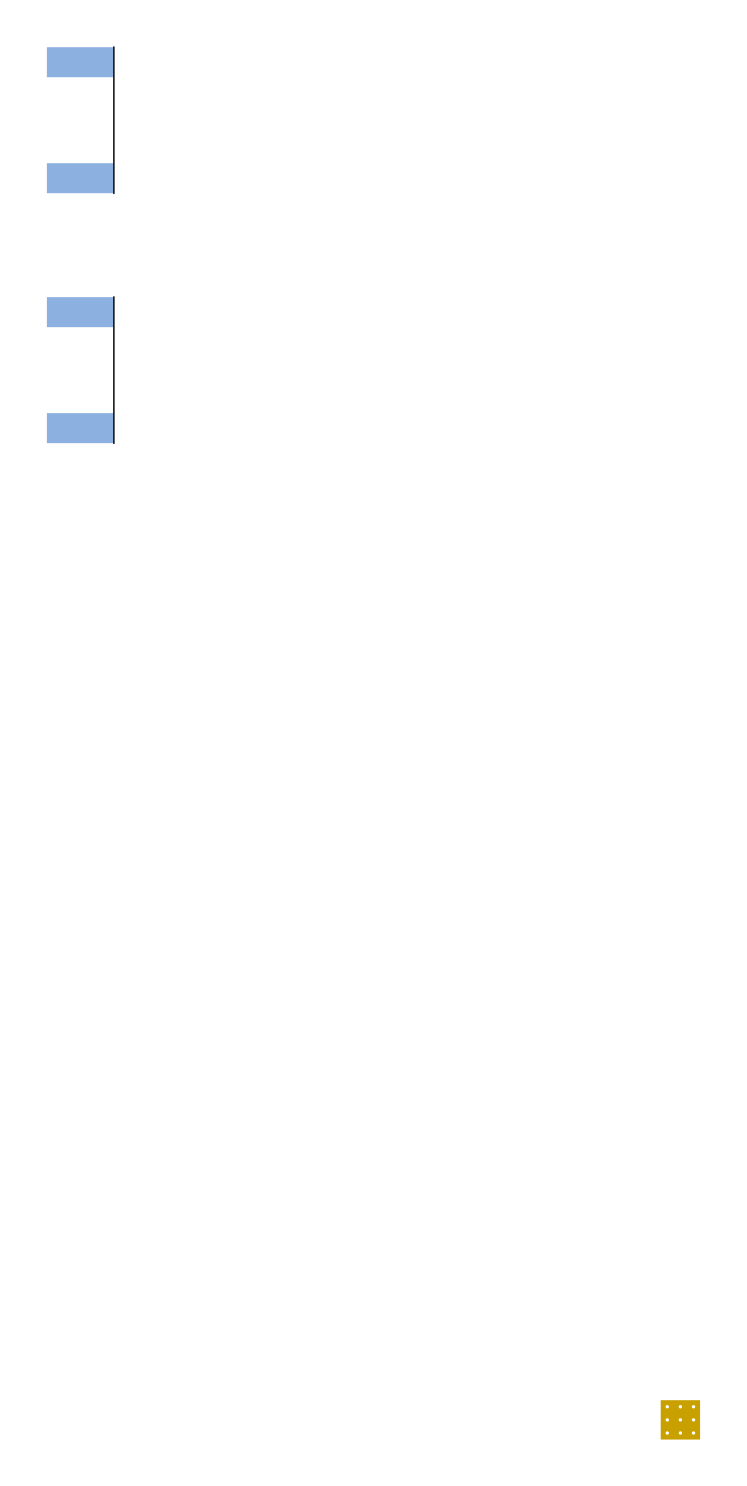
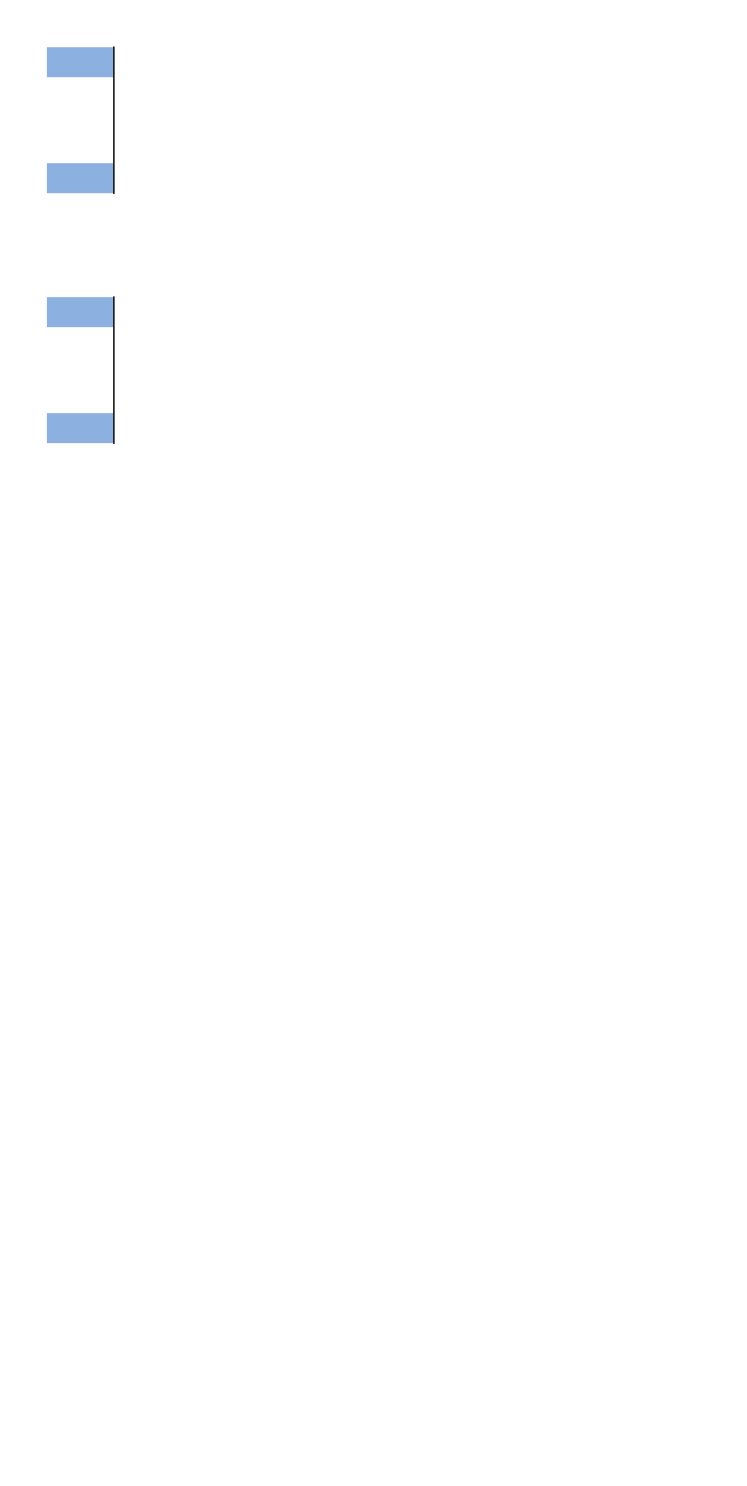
part: (680, 1419) -> none

